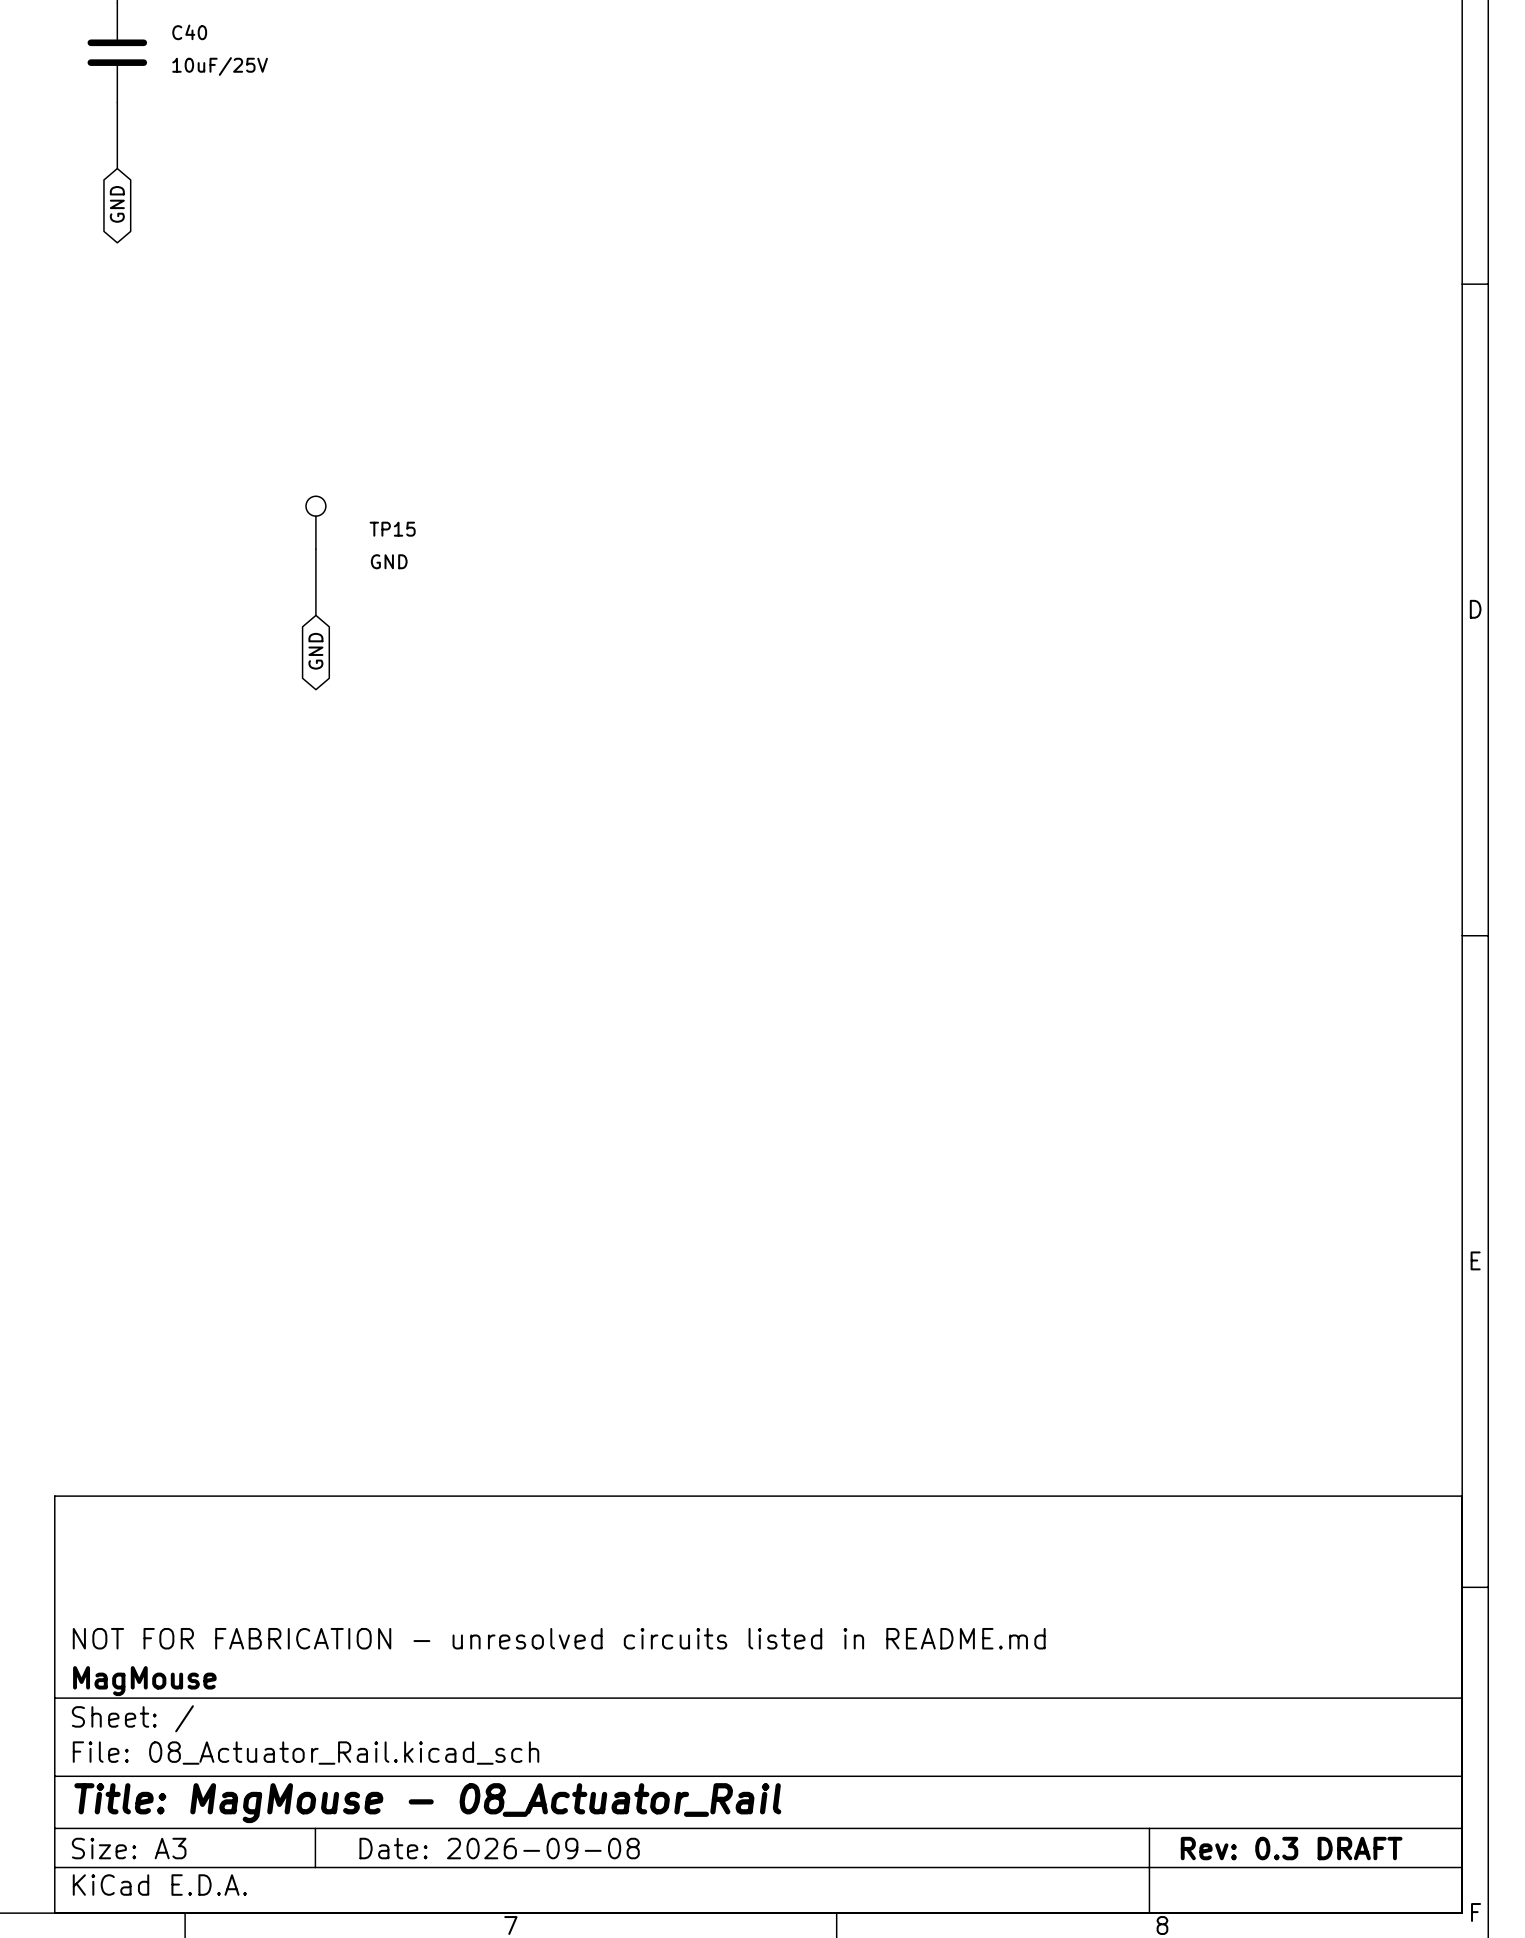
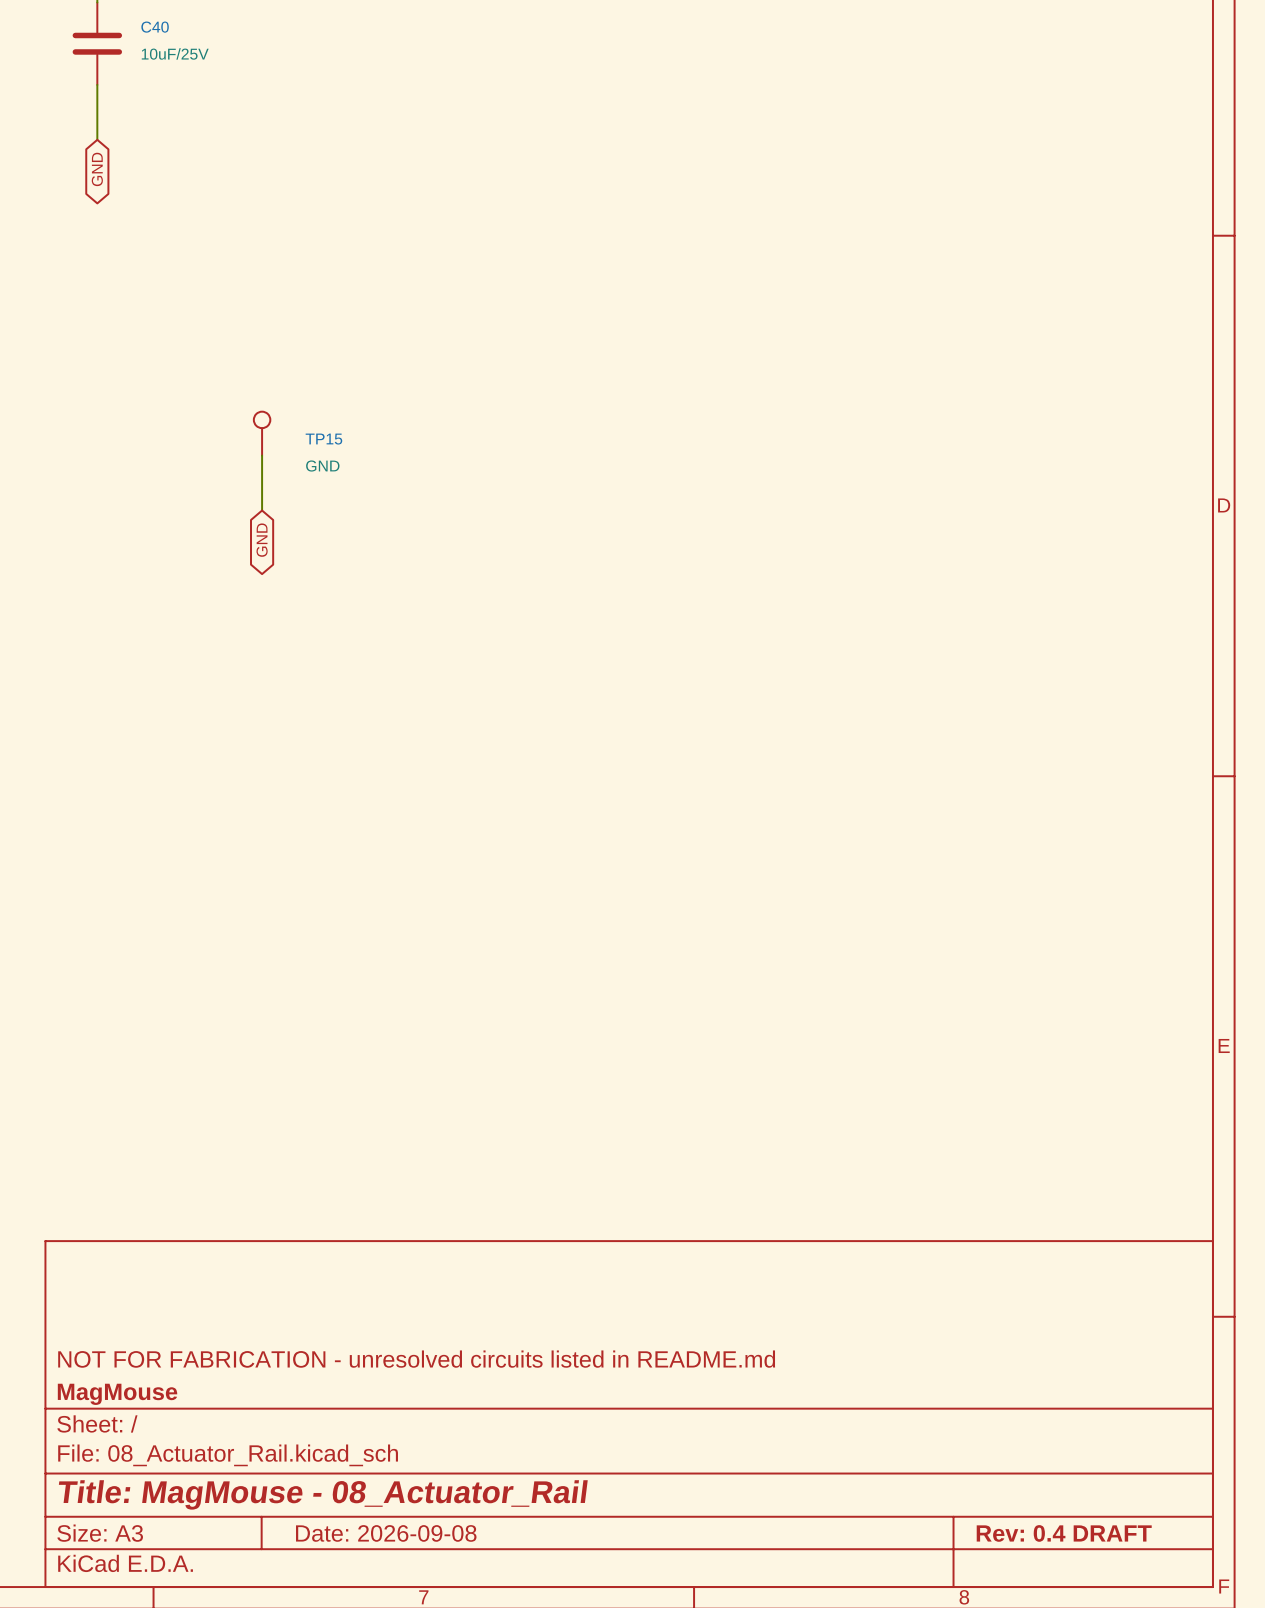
title block: Rev: 0.3 DRAFT (1291, 1848) -> Rev: 0.4 DRAFT (1064, 1533)

